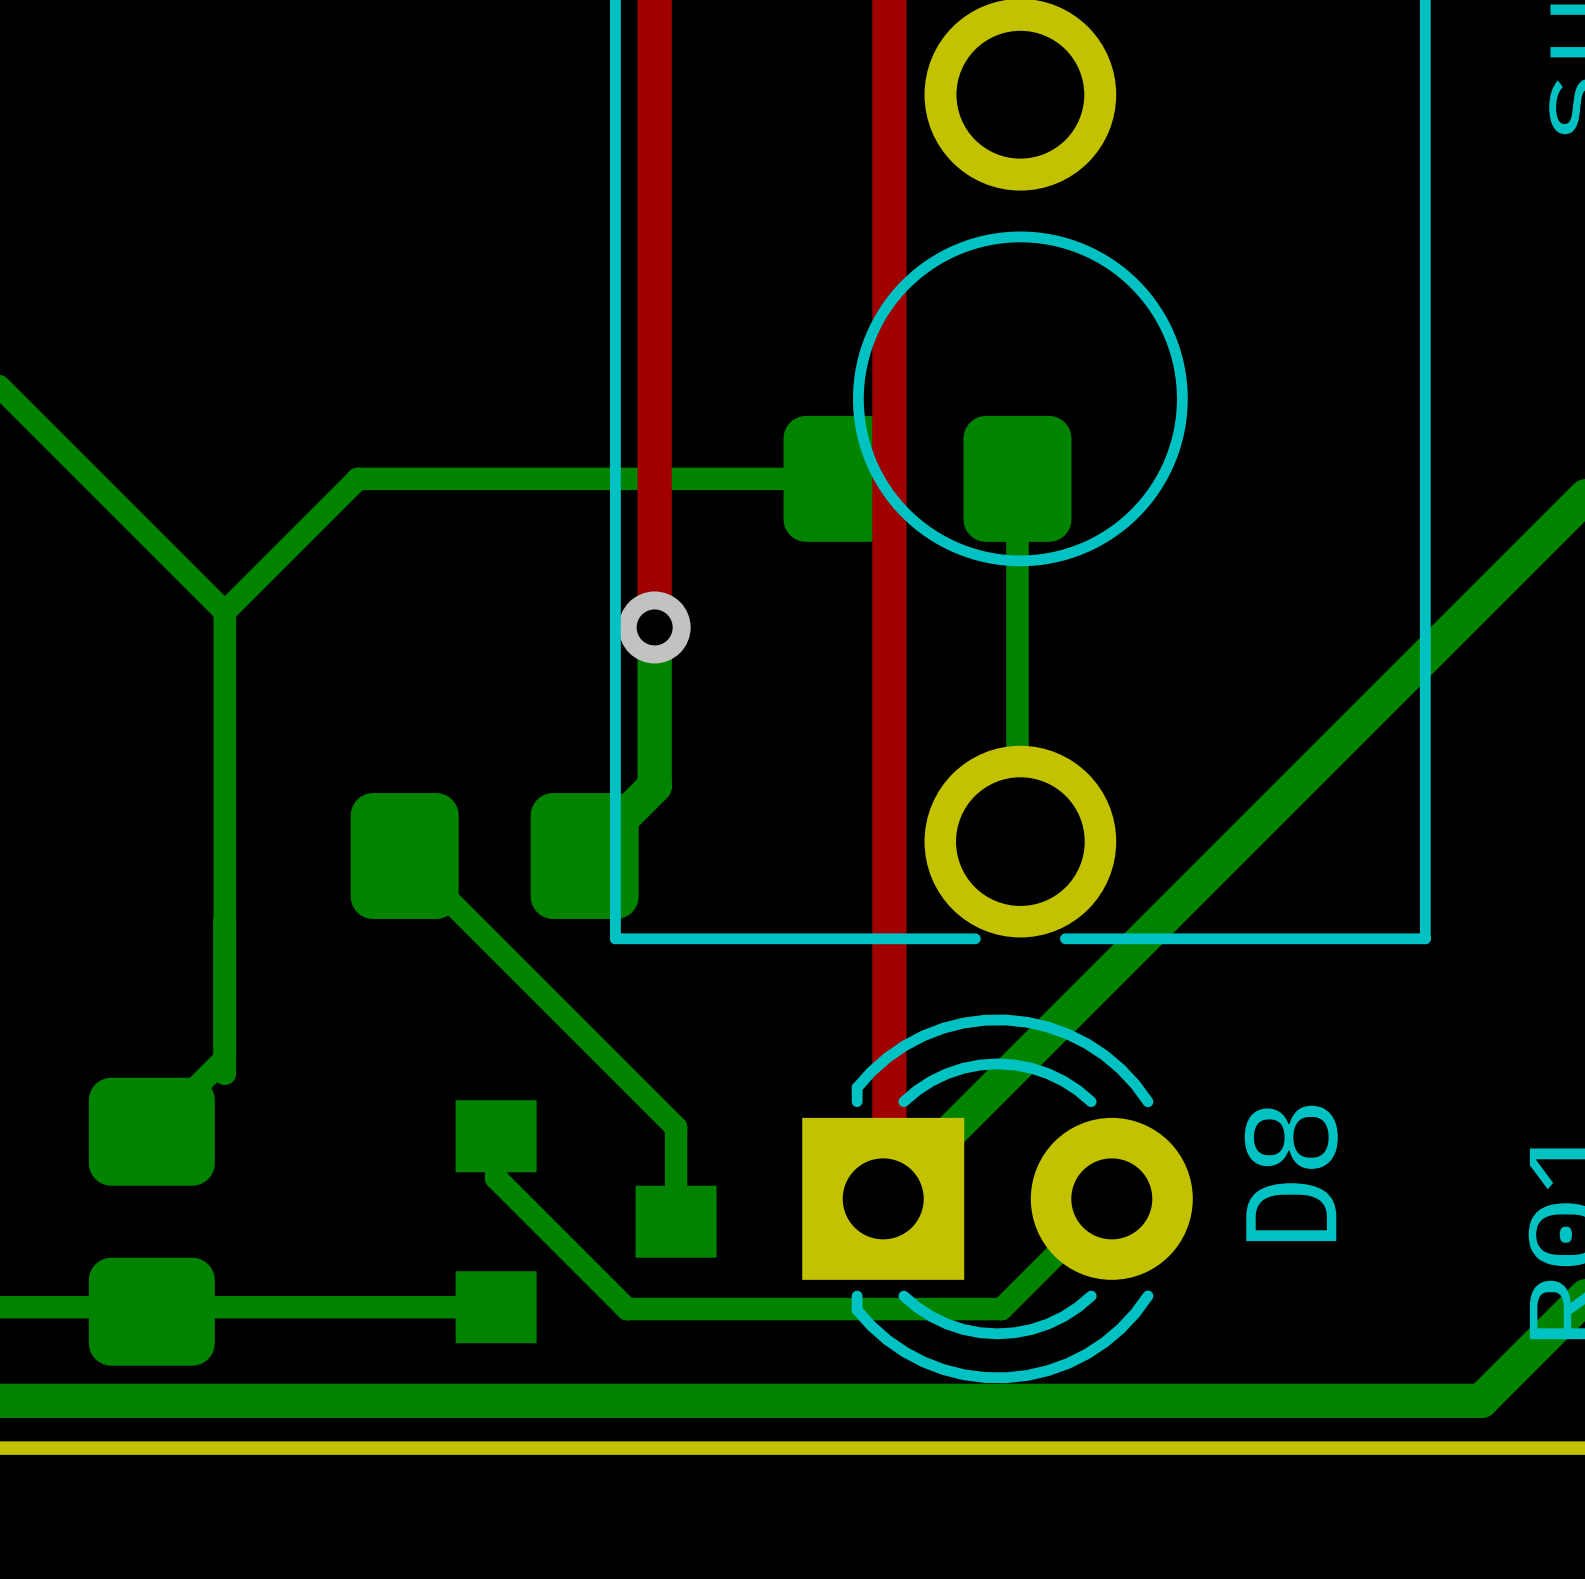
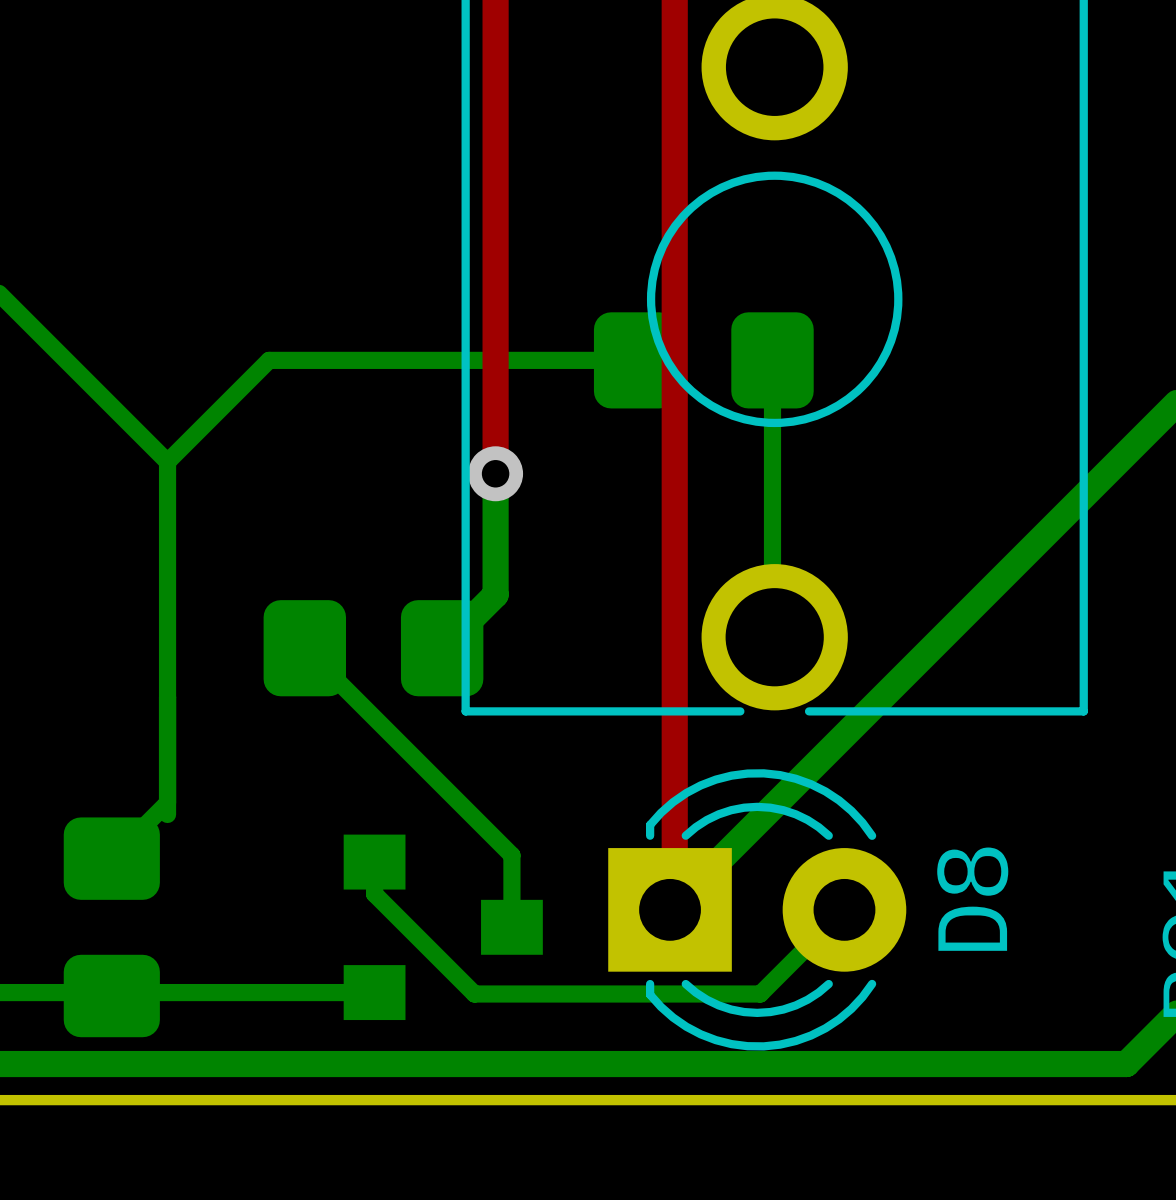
D8 name position: D8 (1291, 1173) -> D8 (972, 899)

